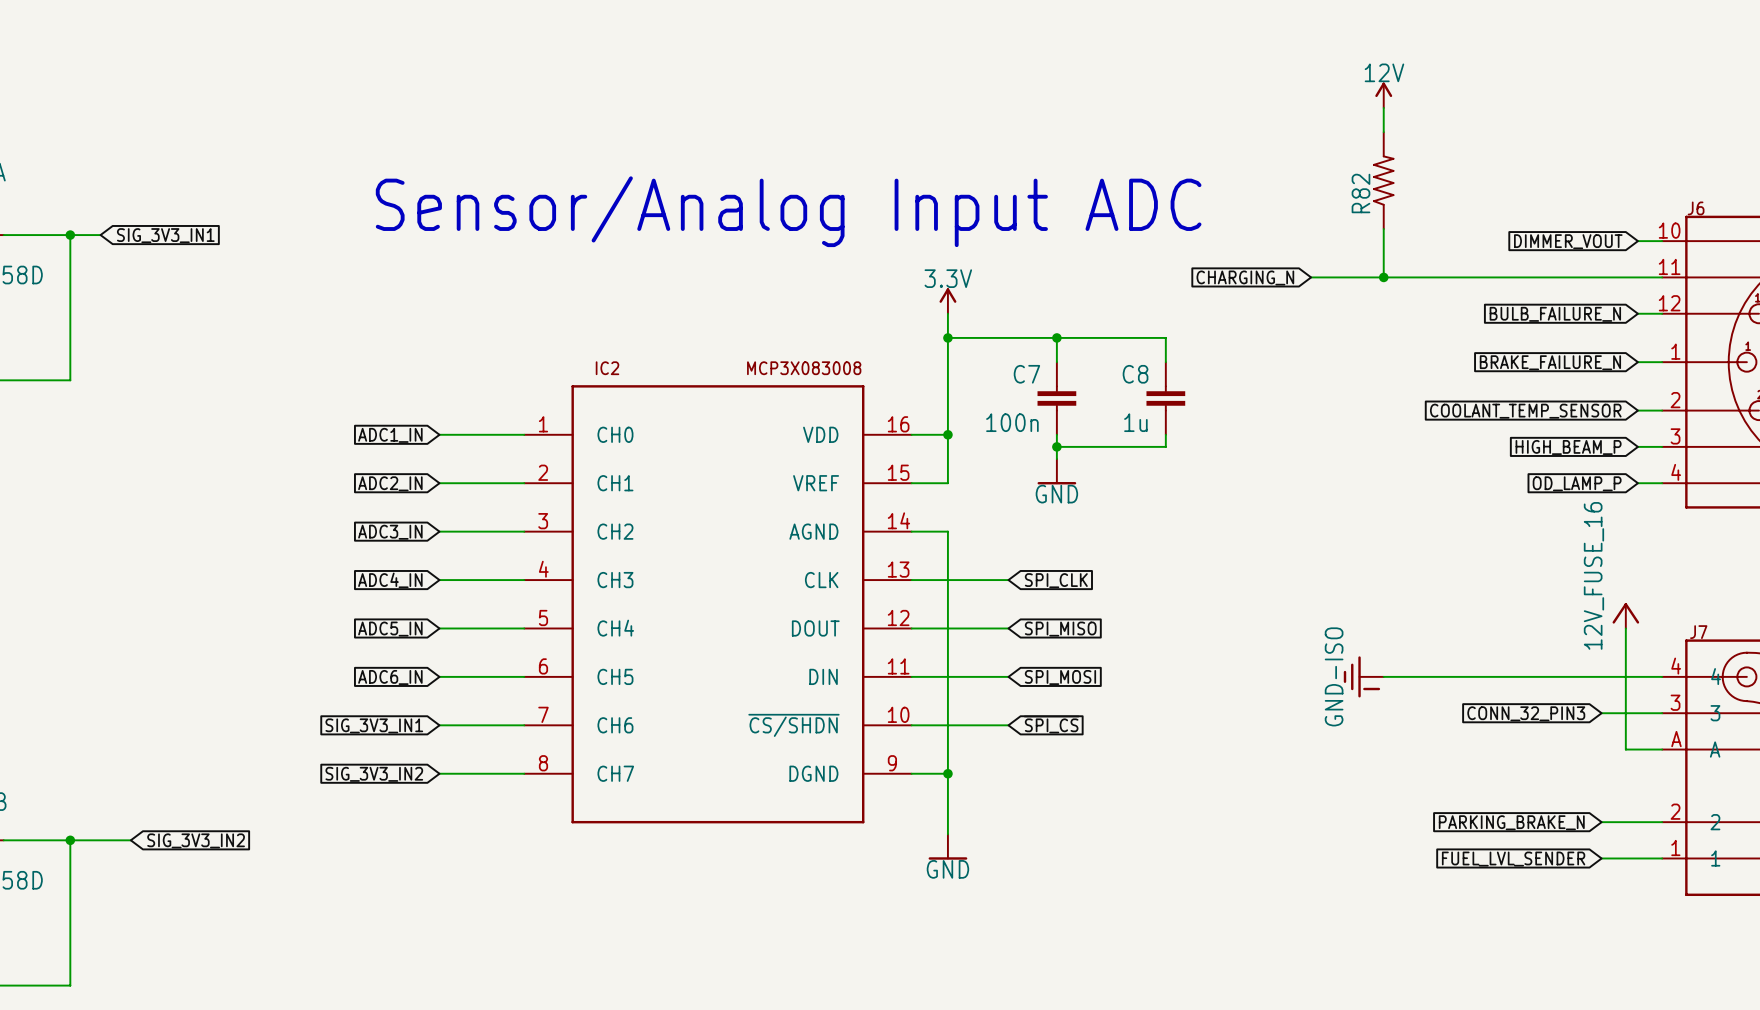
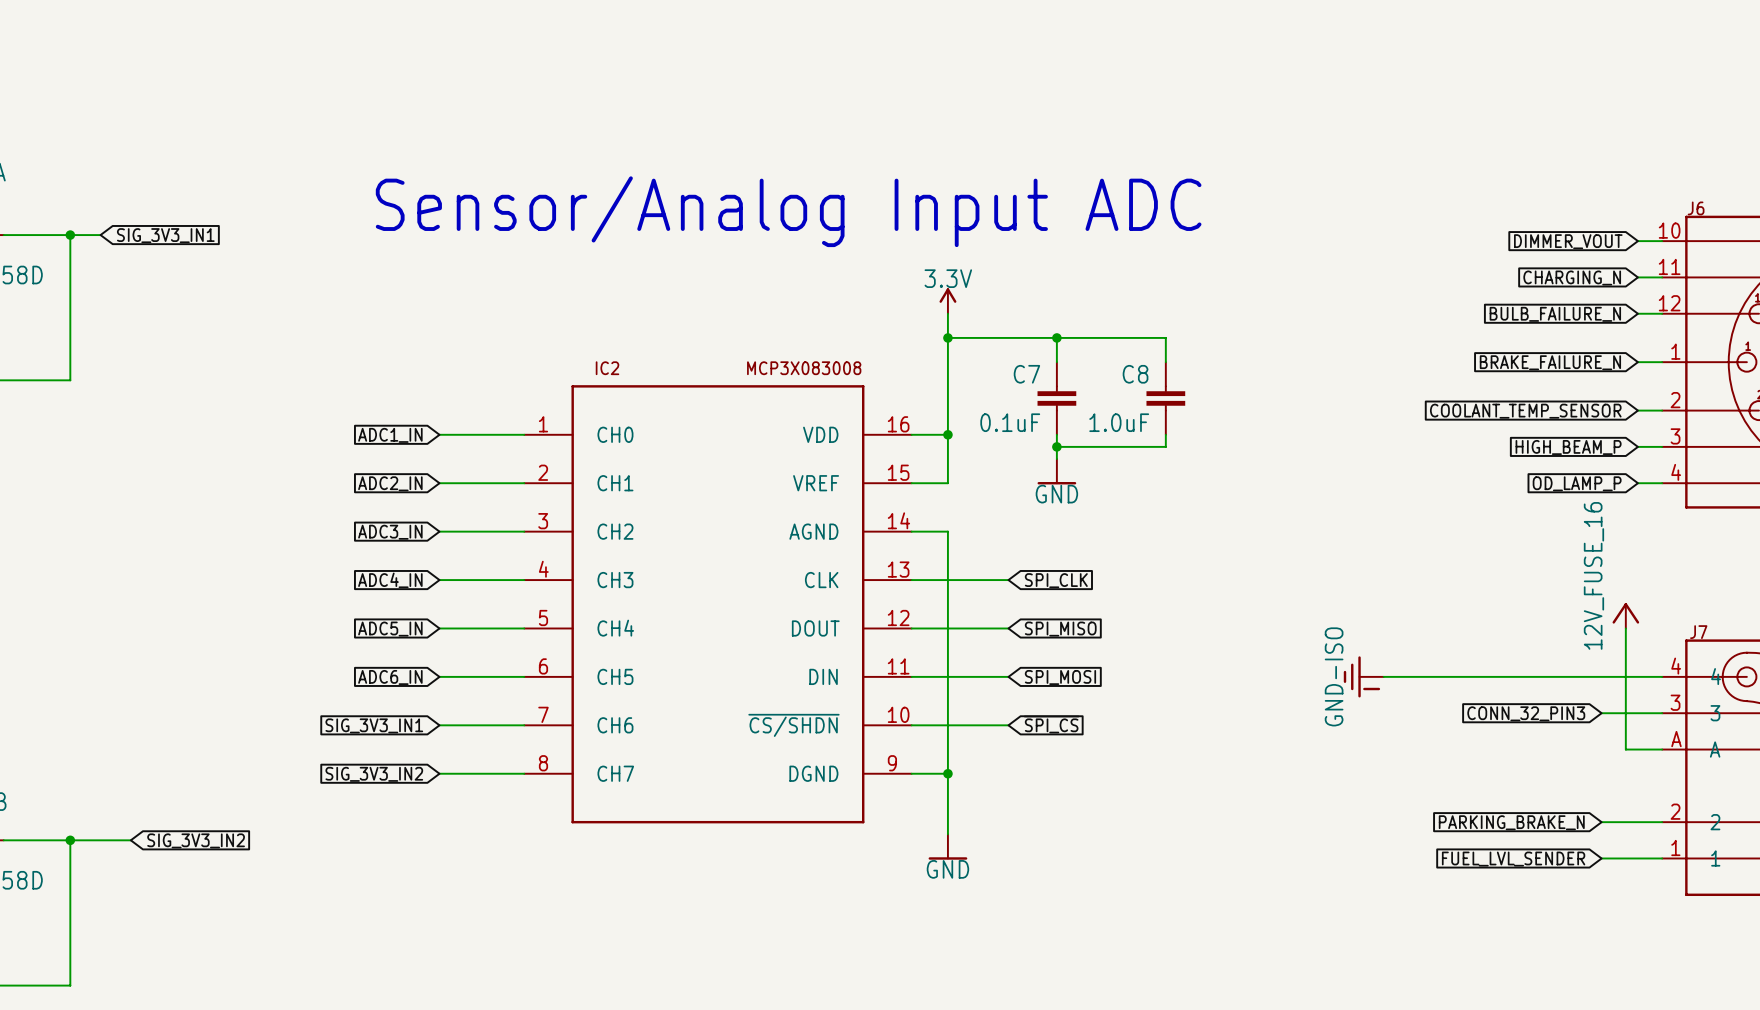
power symbol: 12V (1383, 95) -> none
wire: (1383, 107) (1383, 132) -> none
R82: (1383, 180) -> none
wire: (1383, 229) (1383, 277) -> none
wire: (1311, 277) (1637, 277) -> none
junction: (1383, 277) -> none
global label: CHARGING_N (1245, 278) -> none
global label: none -> CHARGING_N (1572, 278)
C7 value: 100n (1012, 422) -> 0.1uF (1010, 422)
C8 value: 1u (1135, 422) -> 1.0uF (1119, 422)

